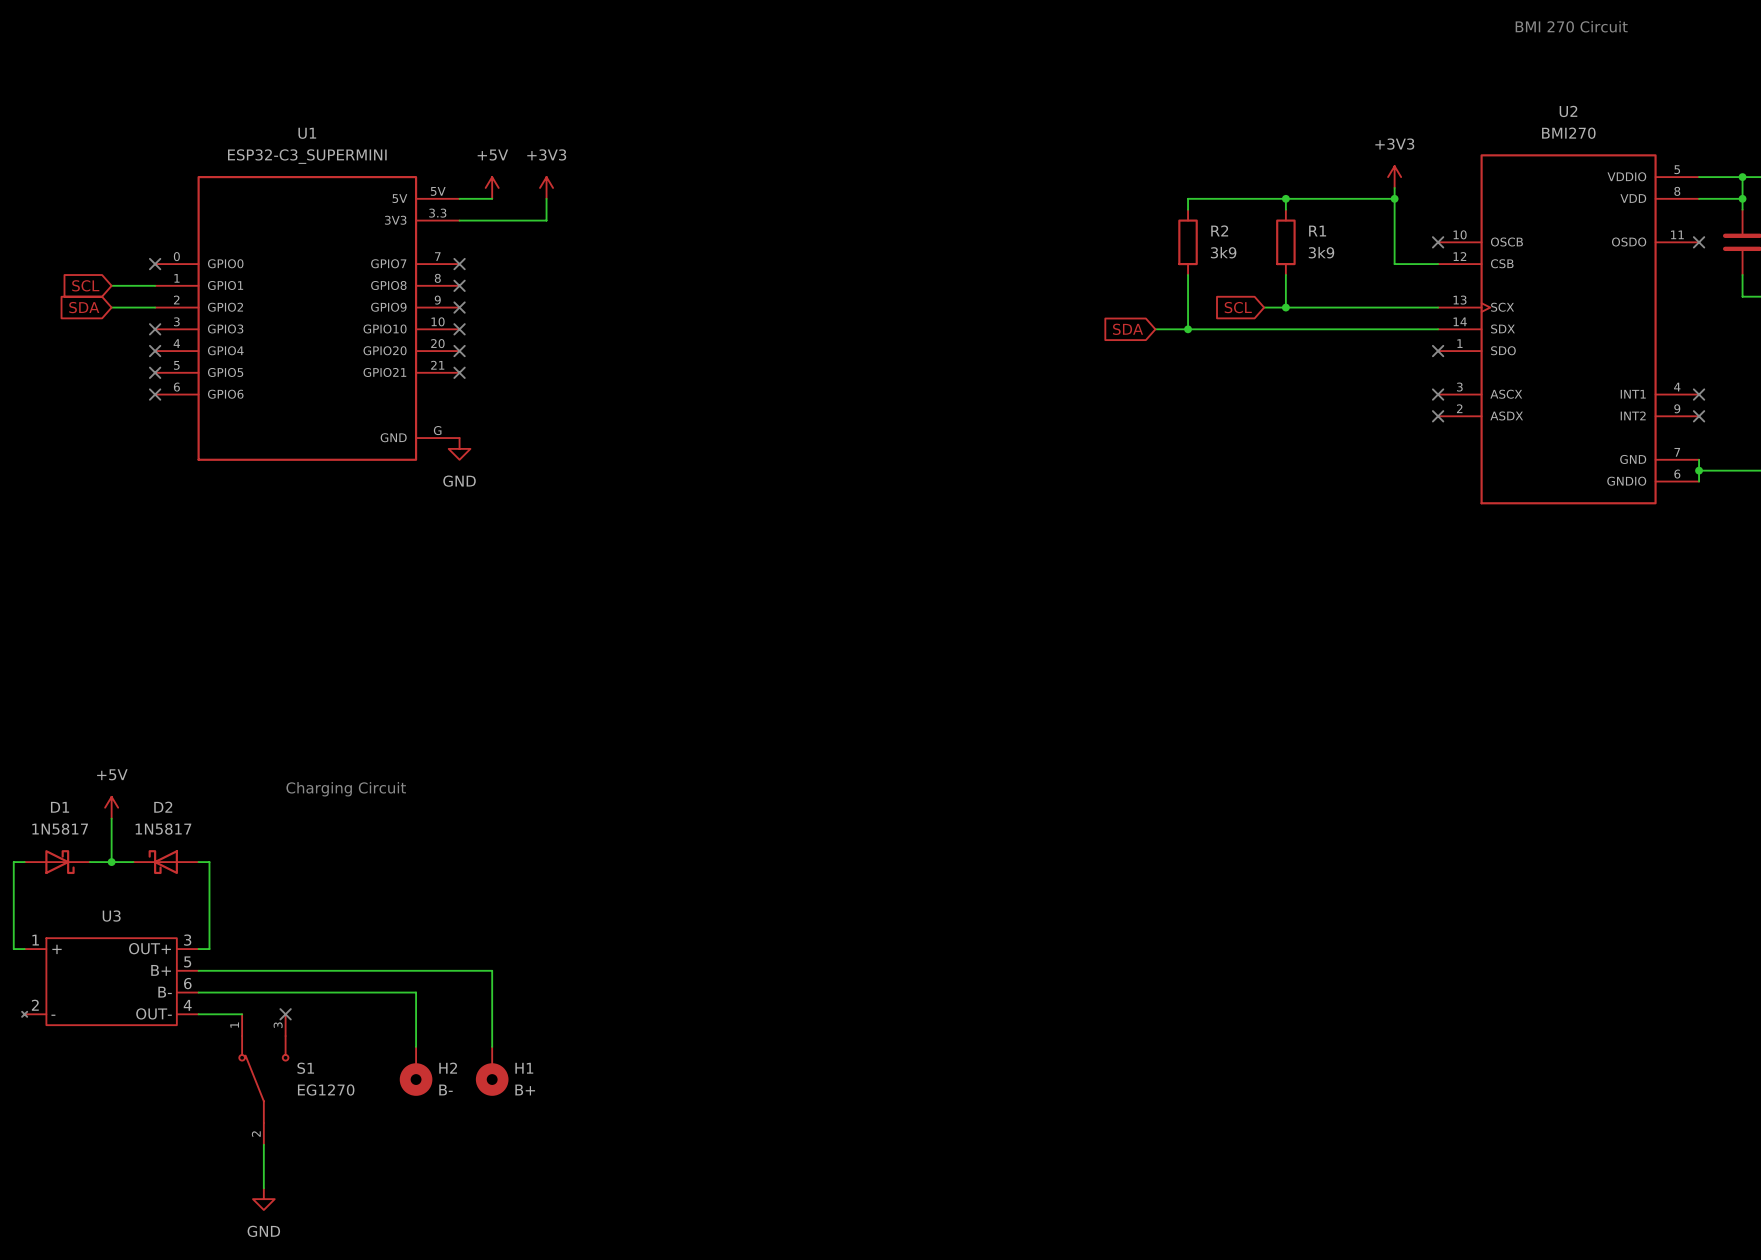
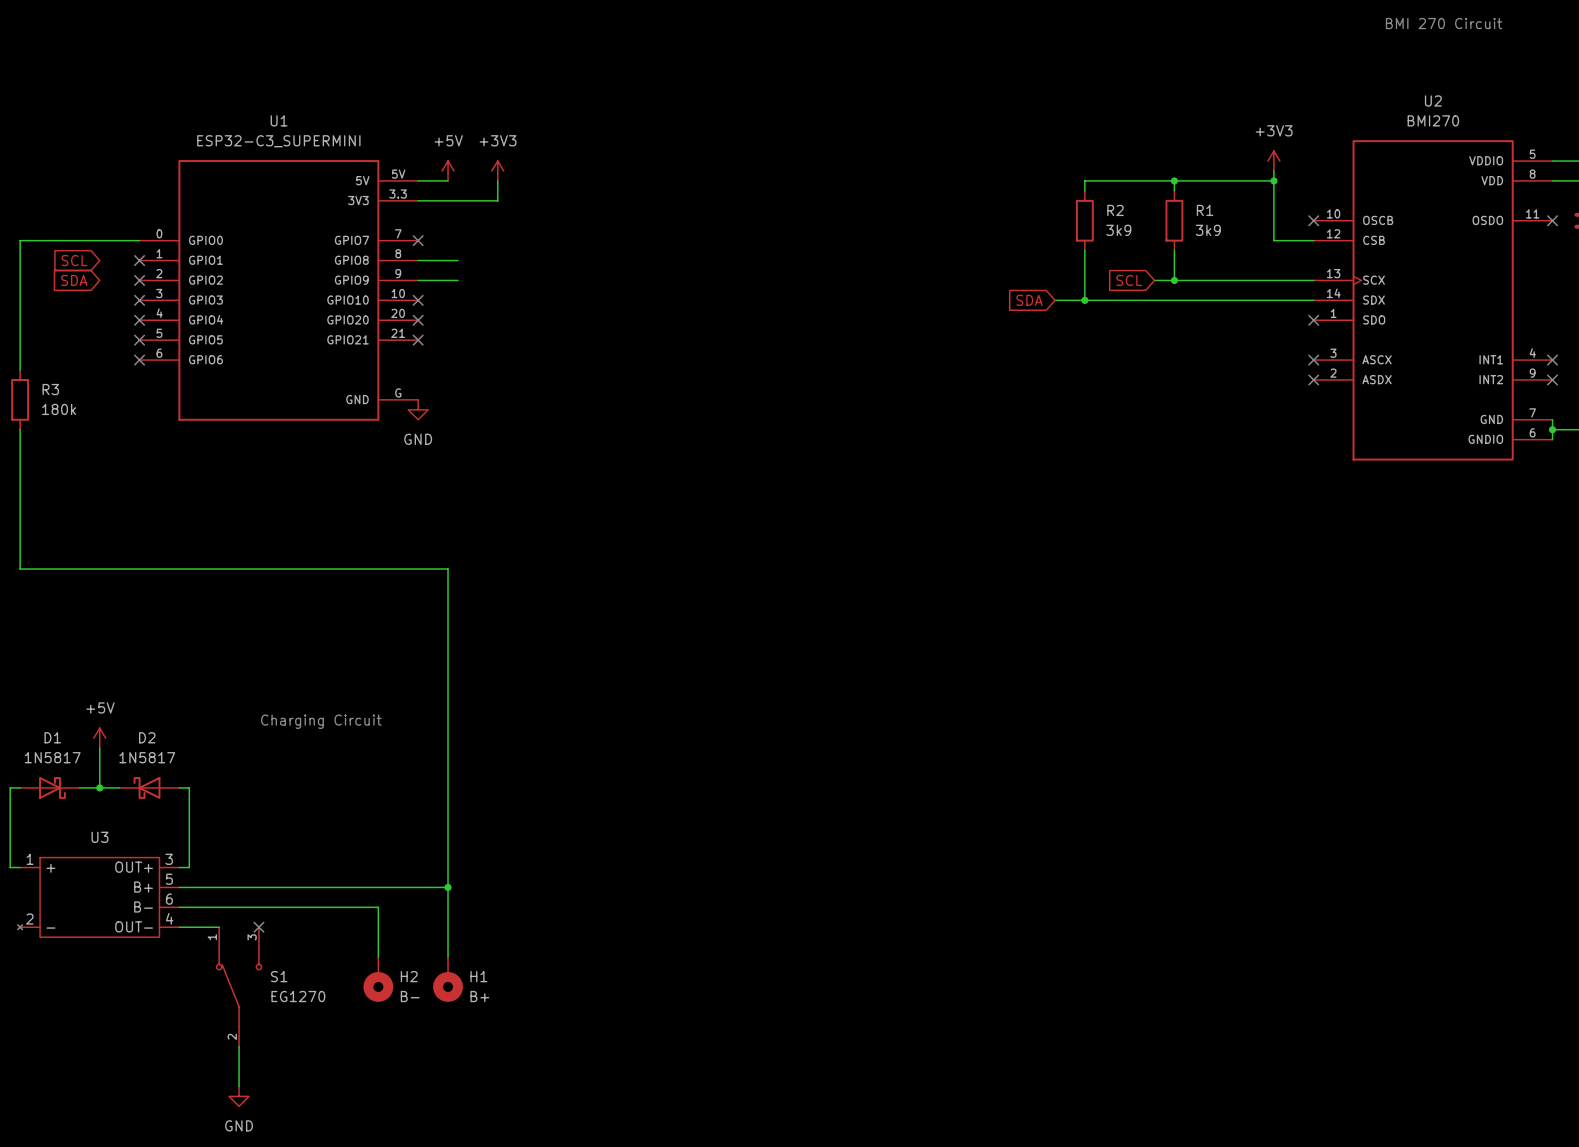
wire: none -> (139, 240) (20, 240) (20, 370)
no-connect mark: (155, 264) -> none
wire: (111, 285) (155, 285) -> none
no-connect mark: none -> (139, 260)
wire: none -> (418, 260) (457, 260)
no-connect mark: (459, 285) -> none
wire: (111, 307) (155, 307) -> none
no-connect mark: none -> (139, 280)
wire: none -> (418, 280) (457, 280)
no-connect mark: (459, 307) -> none
R3: none -> 180k (20, 399)
wire: none -> (20, 429) (20, 569) (448, 569) (448, 887)
junction: none -> (448, 887)

